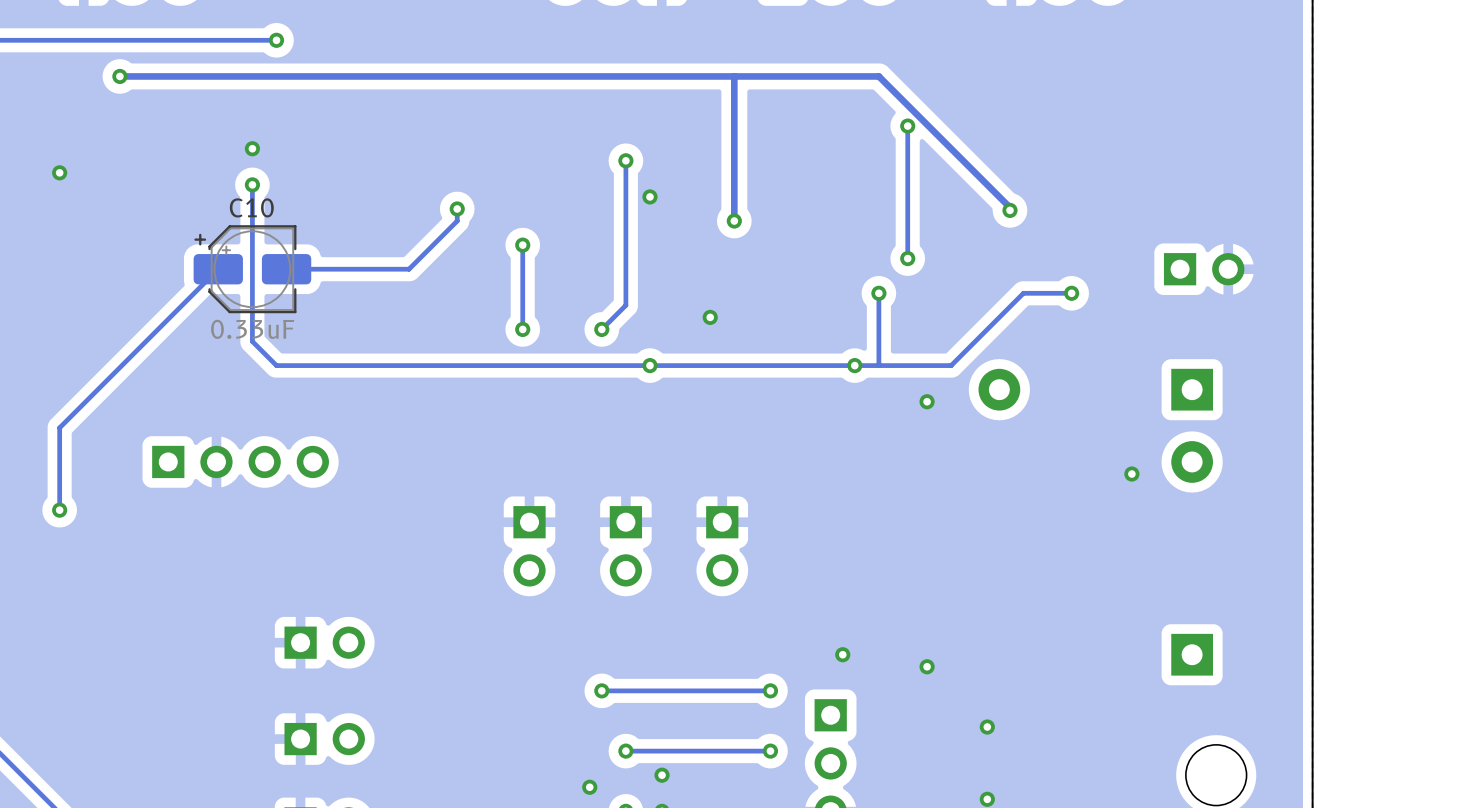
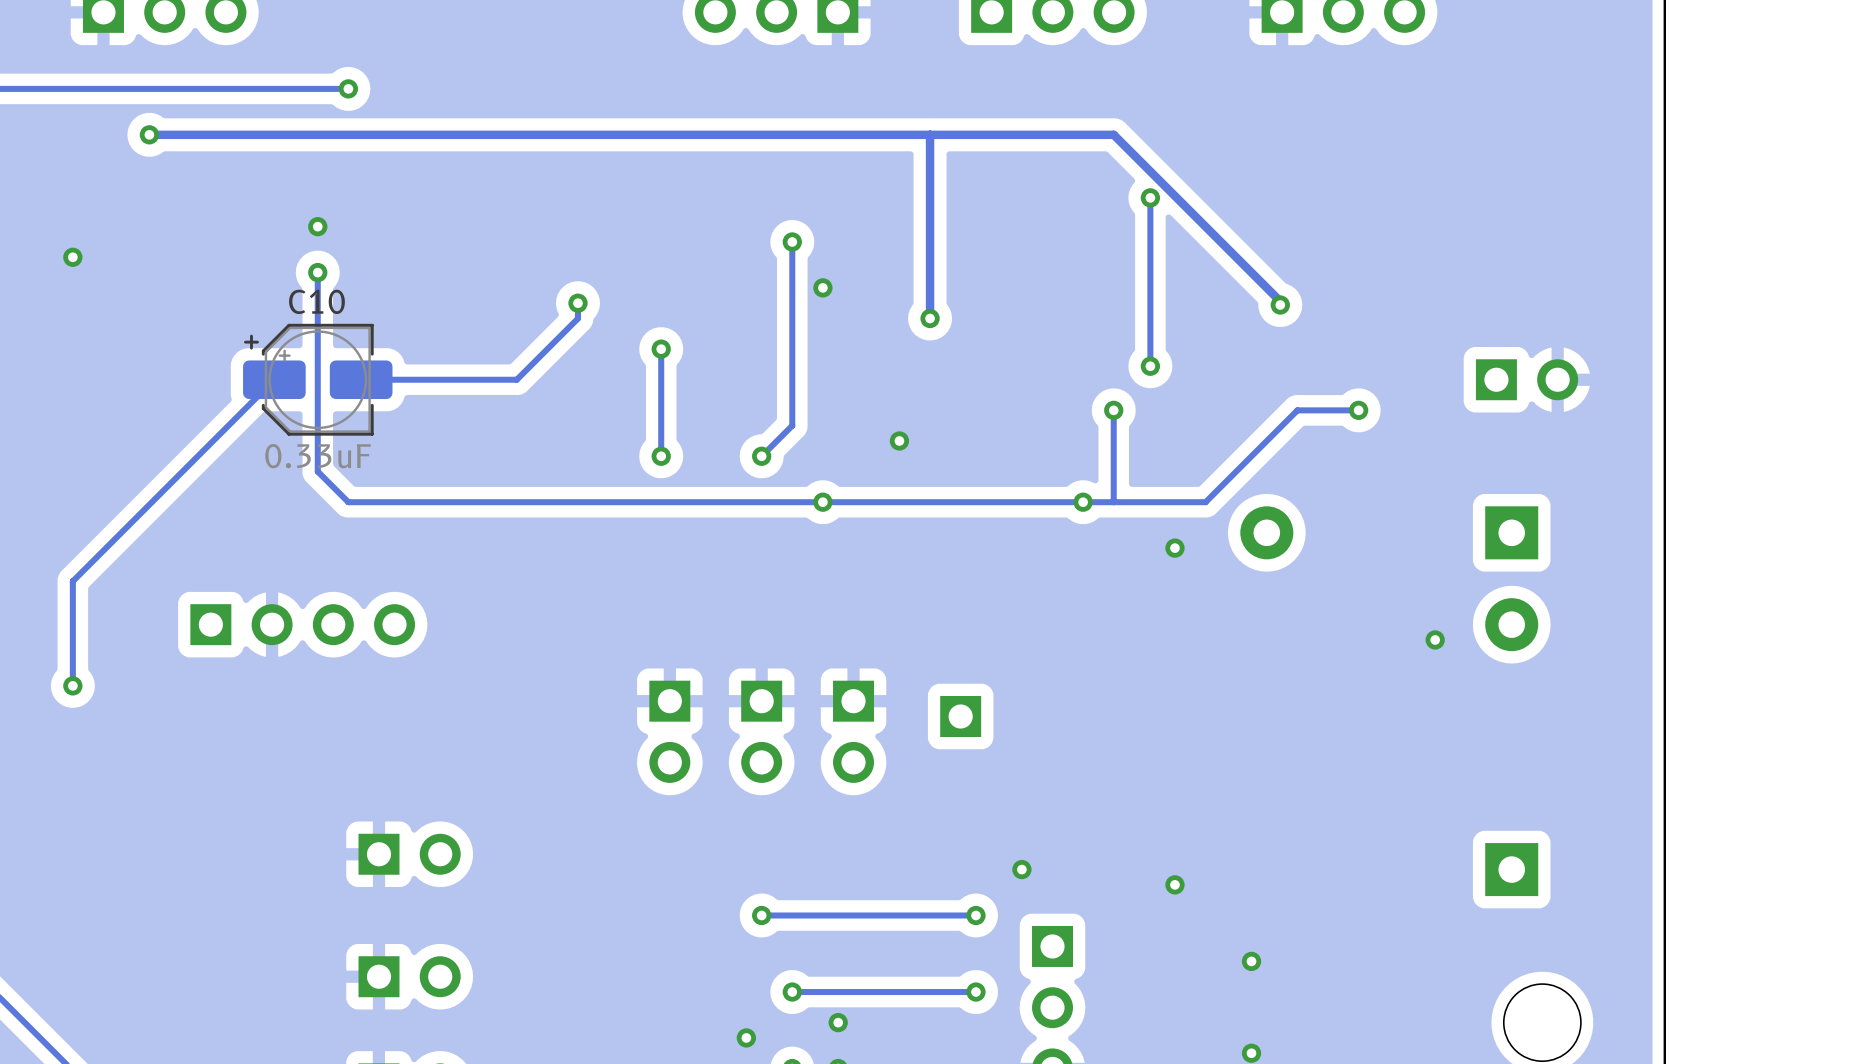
part: none -> (960, 716)
part: none -> (761, 731)
part: (625, 546) -> none
part: none -> (853, 731)
part: (722, 546) -> none
via position: (842, 654) -> (1021, 869)

